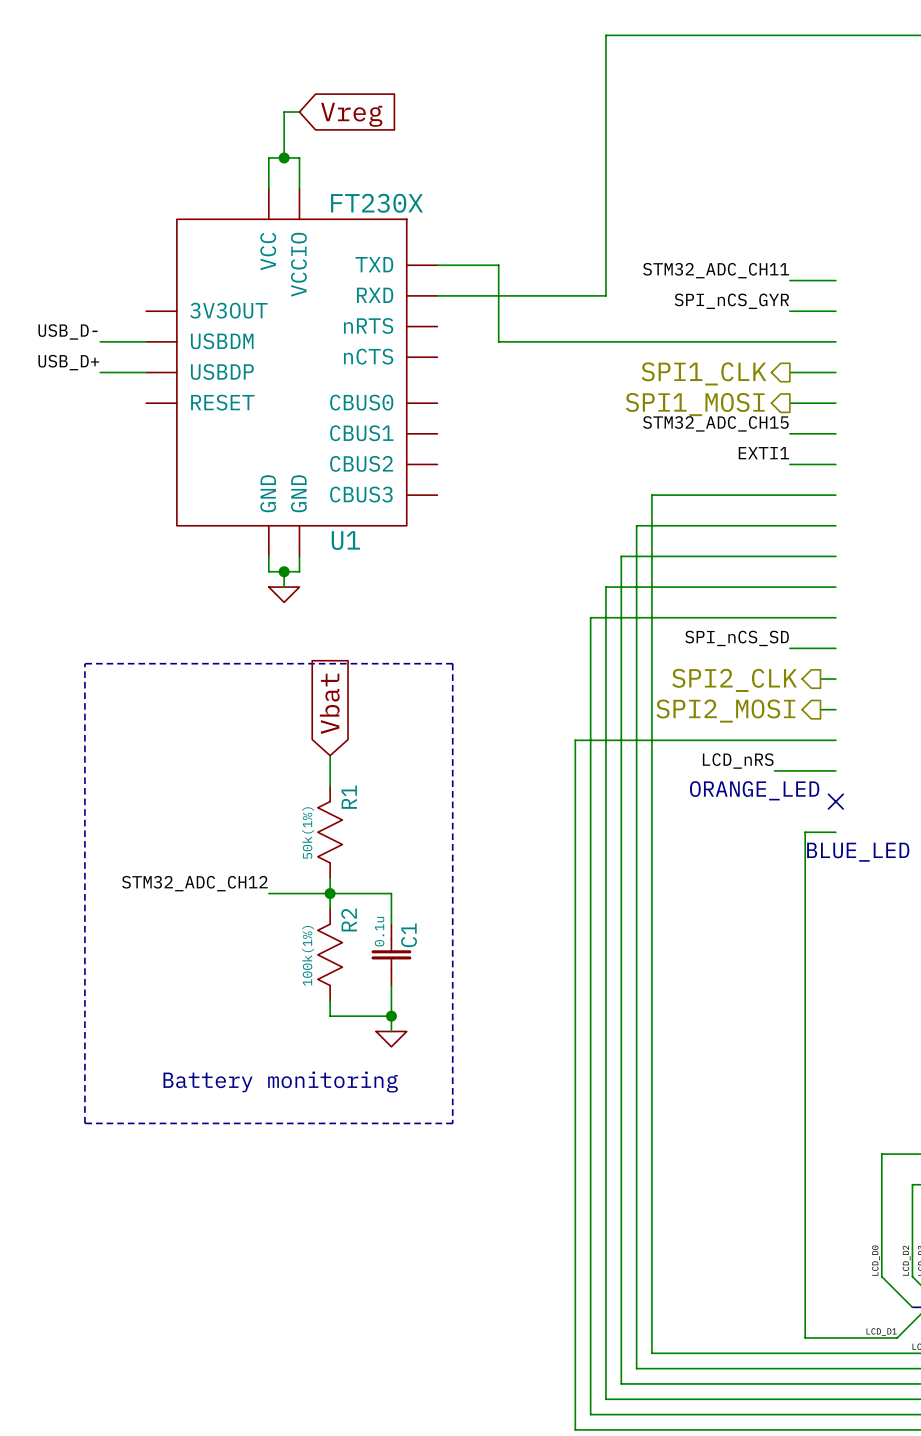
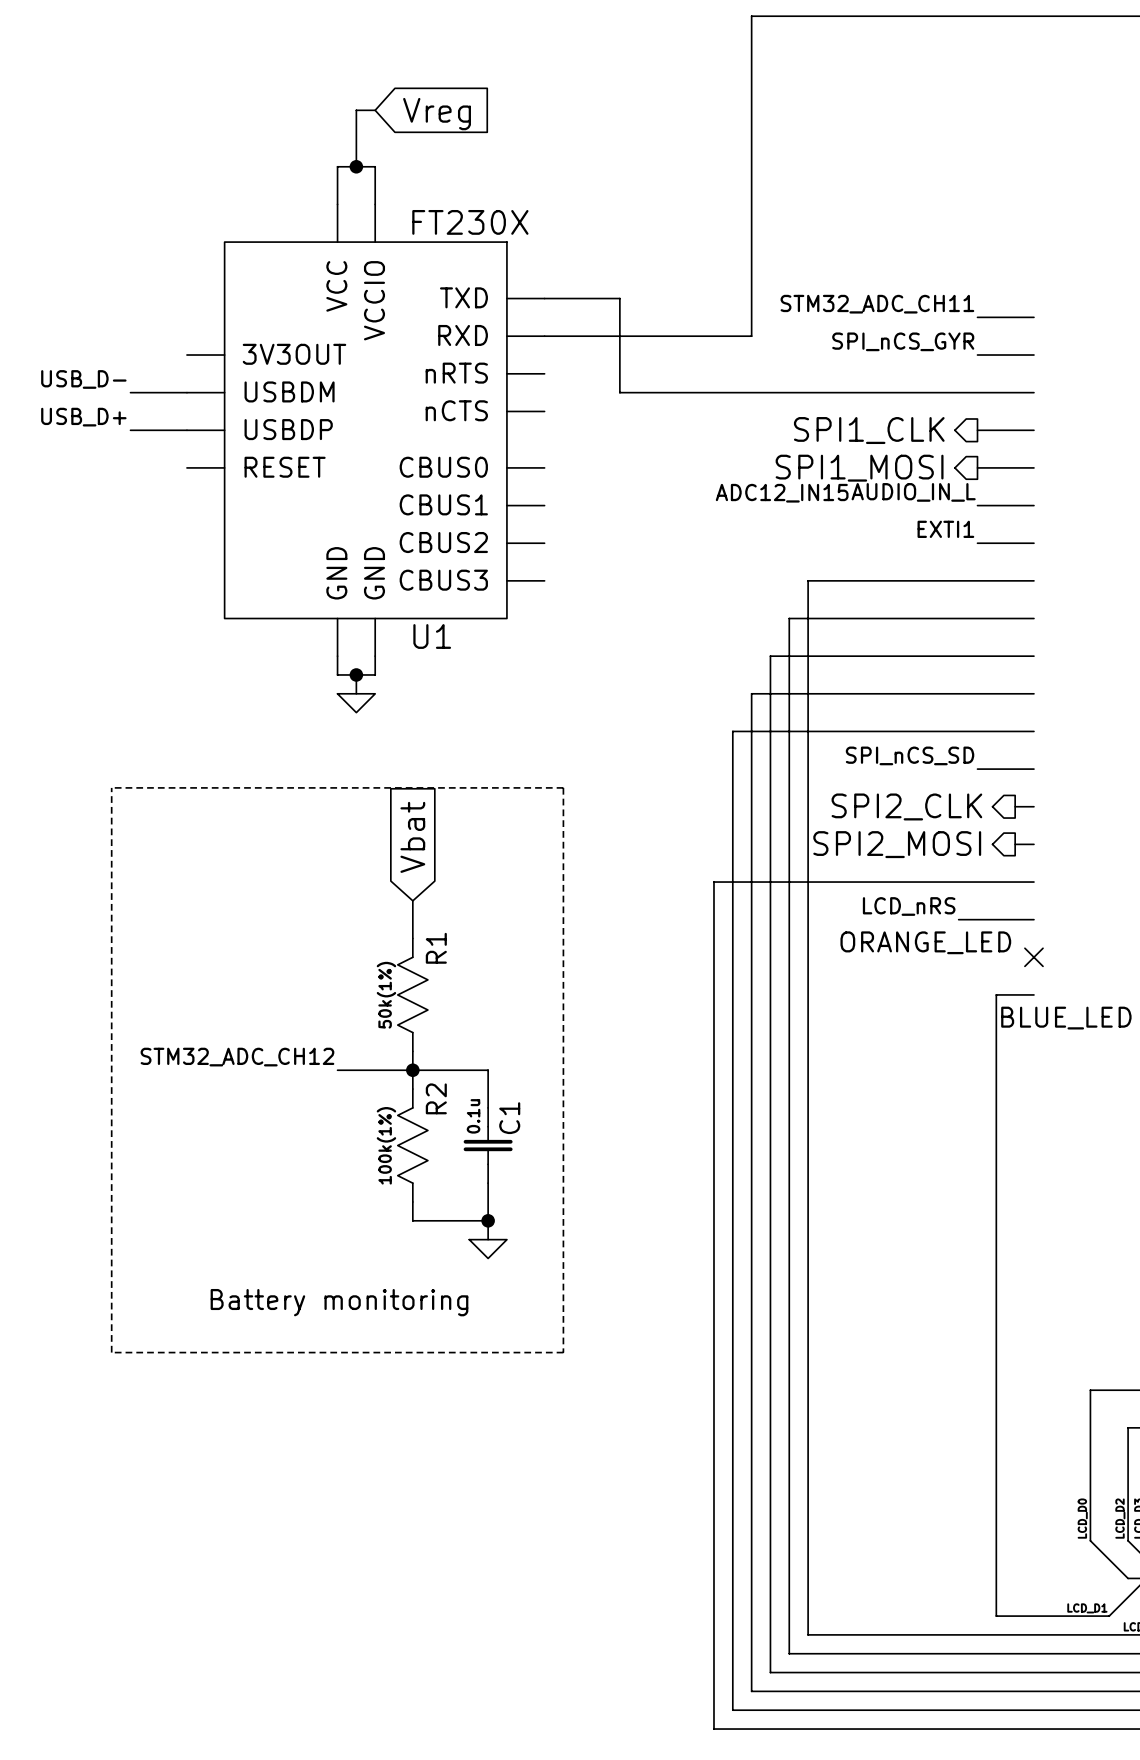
label: STM32_ADC_CH15 (715, 423) -> AUDIO_IN_L (913, 492)
text: none -> ADC12_IN15 (782, 493)

